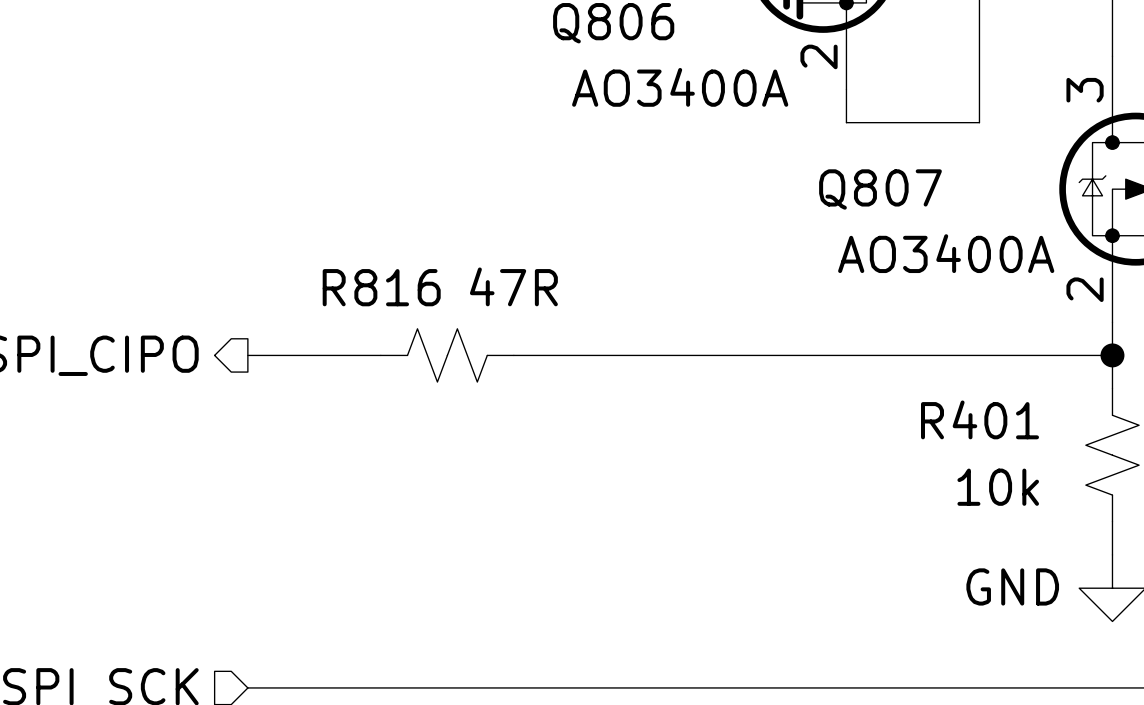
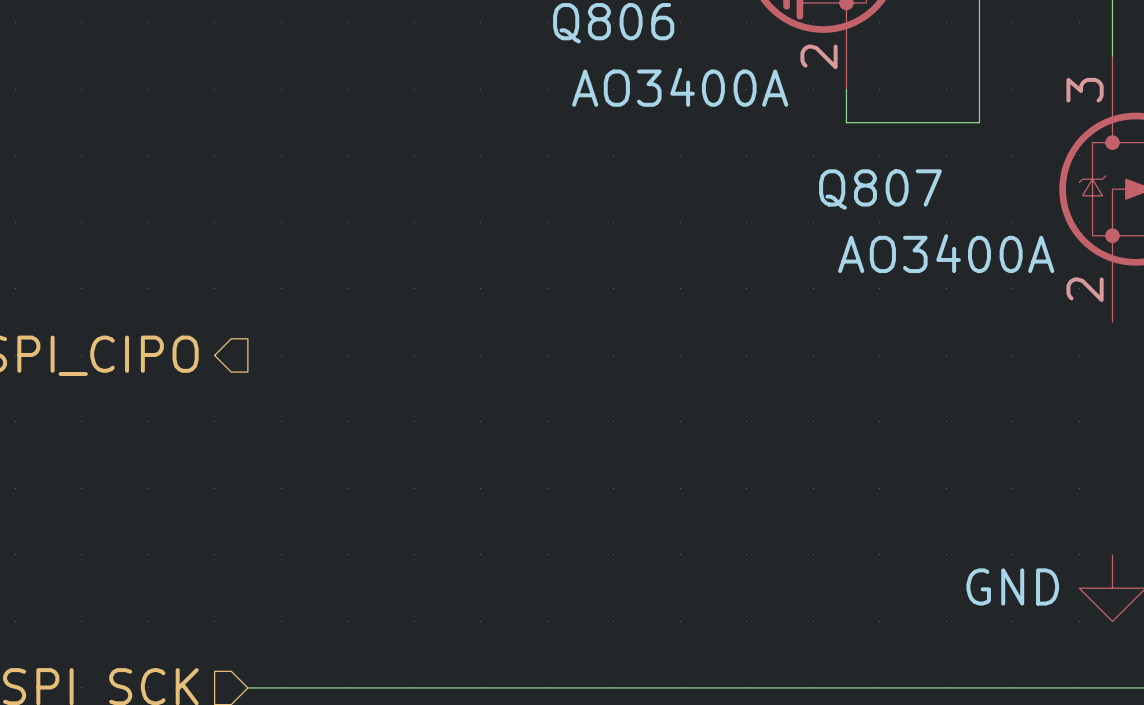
wire: (1112, 322) (1112, 388) -> none
wire: (247, 355) (380, 355) -> none
R816: 47R (447, 355) -> none
wire: (513, 355) (1112, 355) -> none
junction: (1112, 355) -> none
R401: 10k (1112, 455) -> none
wire: (1112, 521) (1112, 554) -> none

